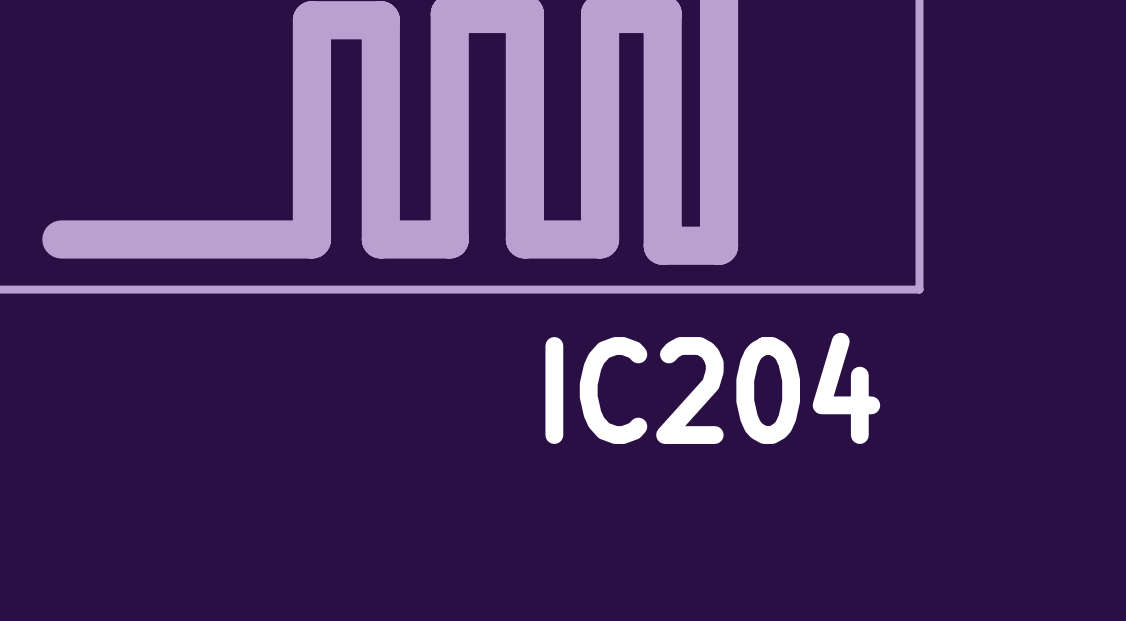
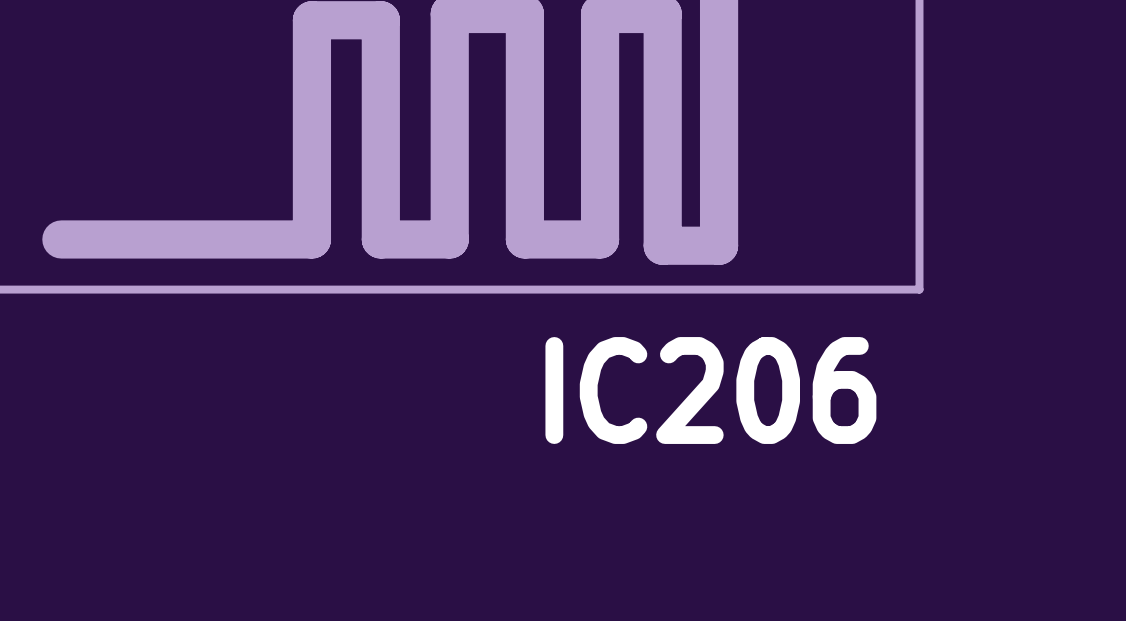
IC204 name: IC204 (712, 388) -> IC206 (710, 390)

